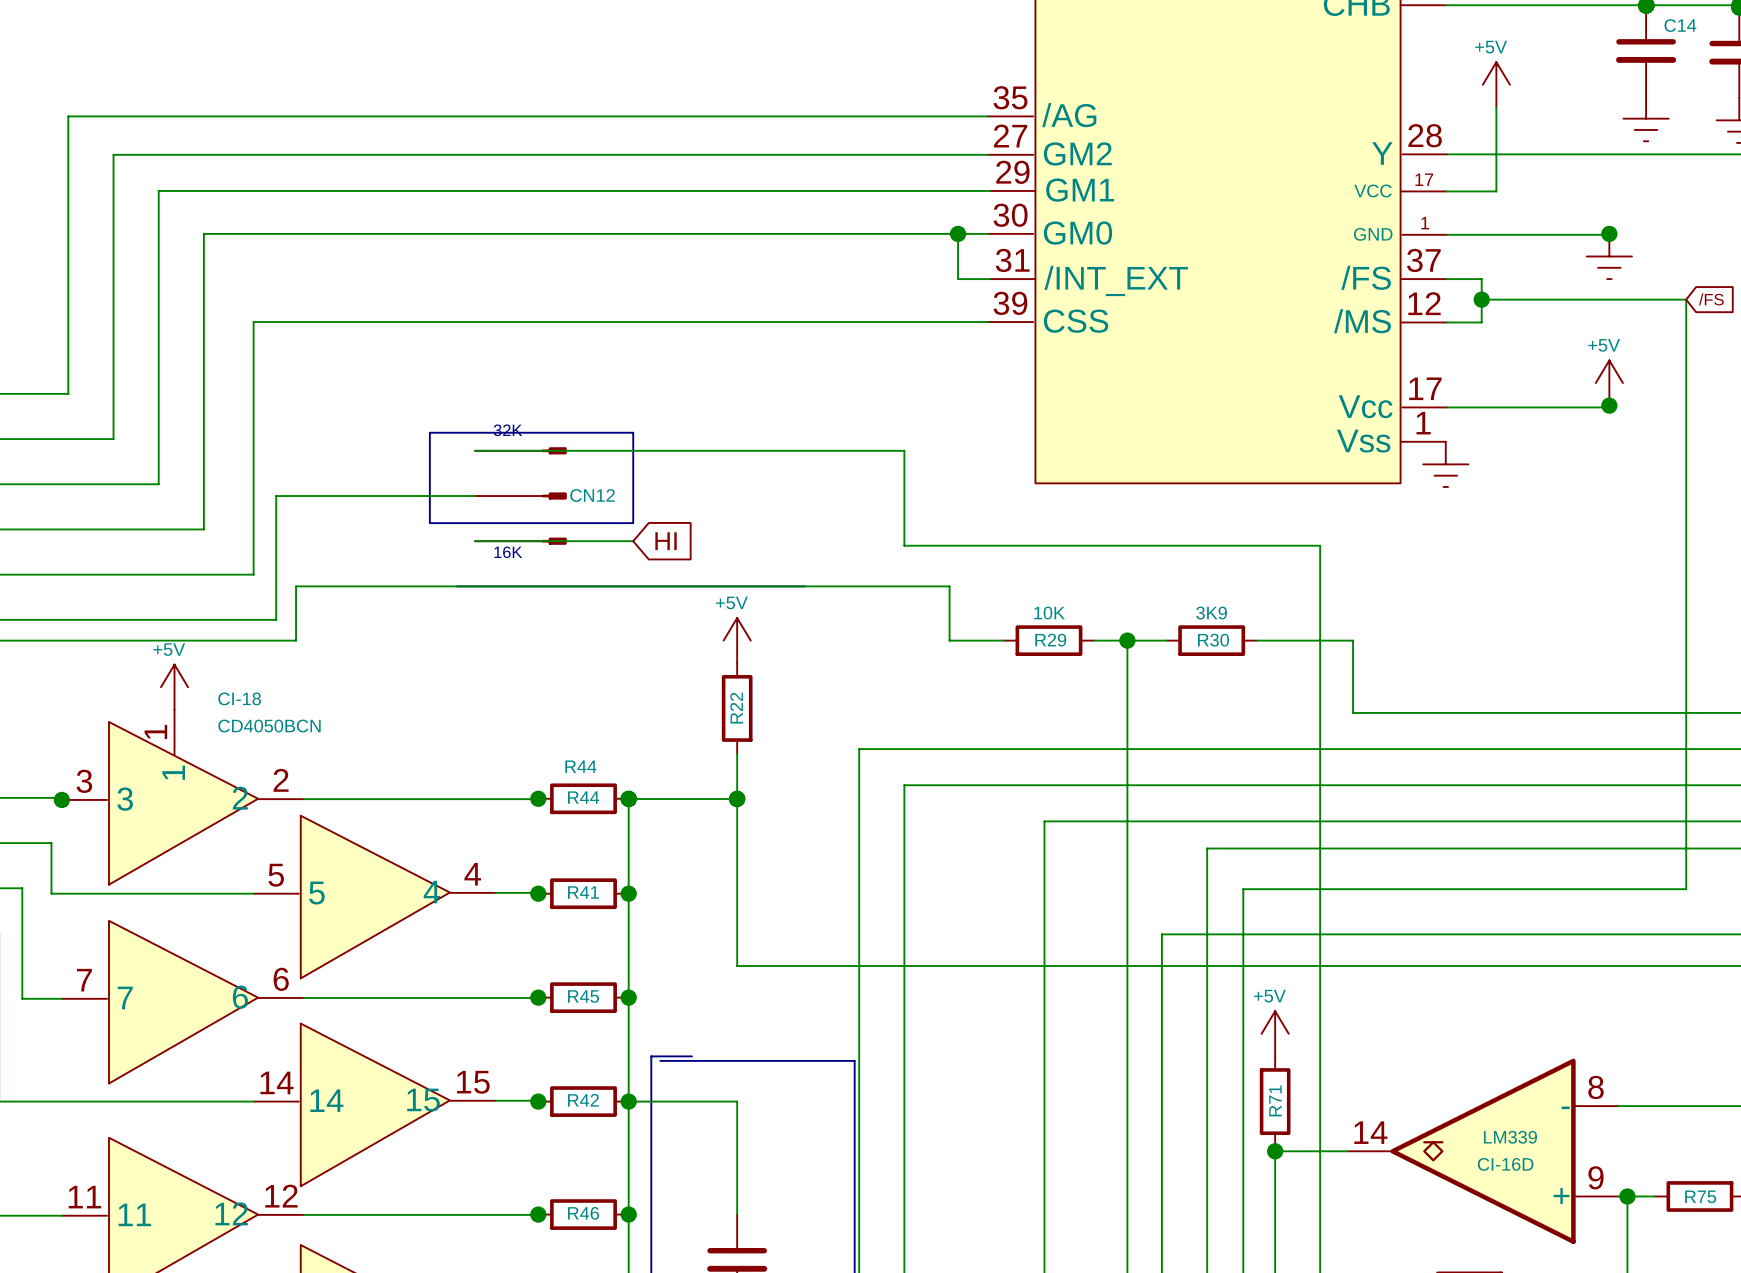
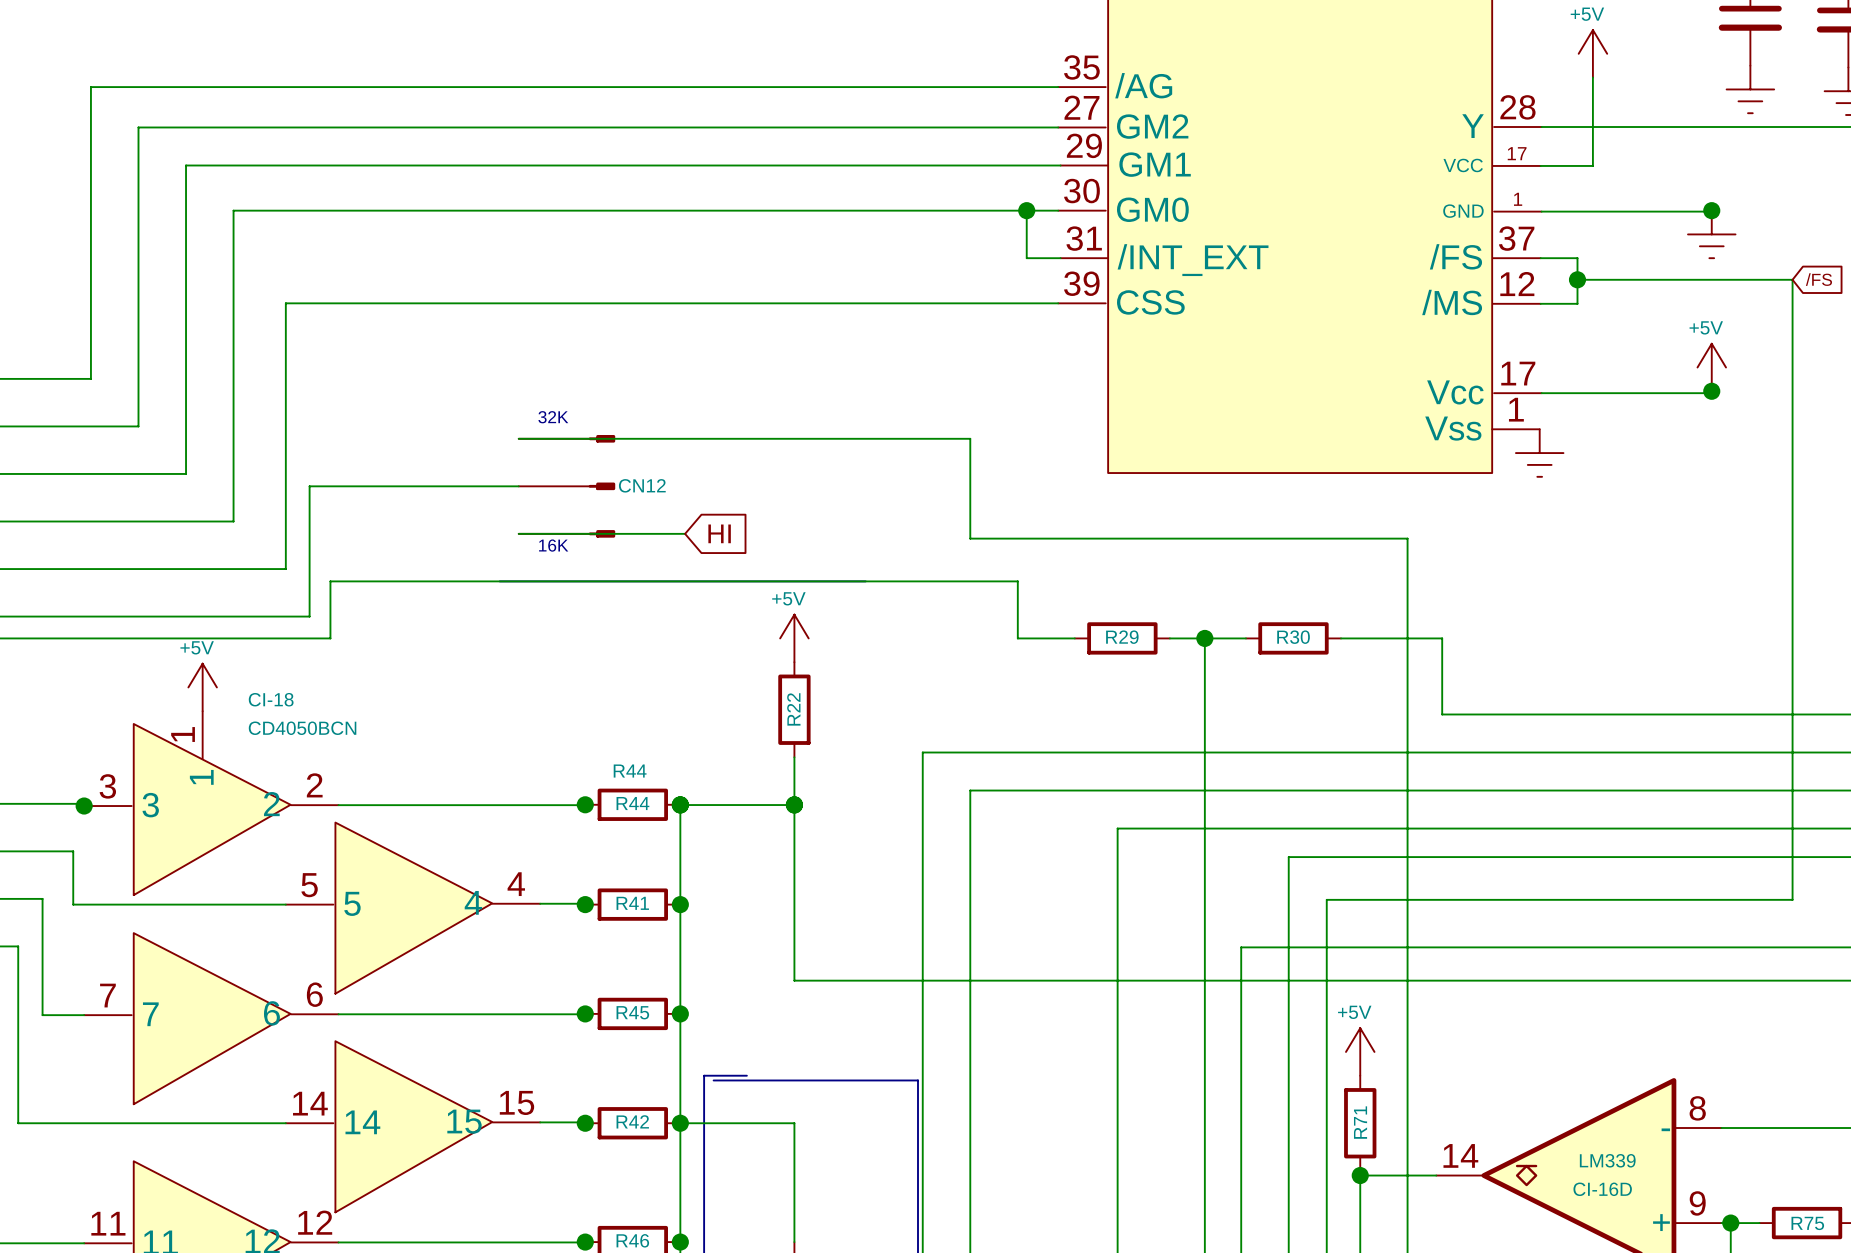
line: (429, 432) (633, 432) (633, 523) (429, 523) (429, 432) -> none
R29 value: 10K (1049, 613) -> R29 (1122, 637)
R30 value: 3K9 (1211, 613) -> R30 (1293, 637)
R29 name: R29 (1050, 640) -> none
R30 name: R30 (1213, 640) -> none

